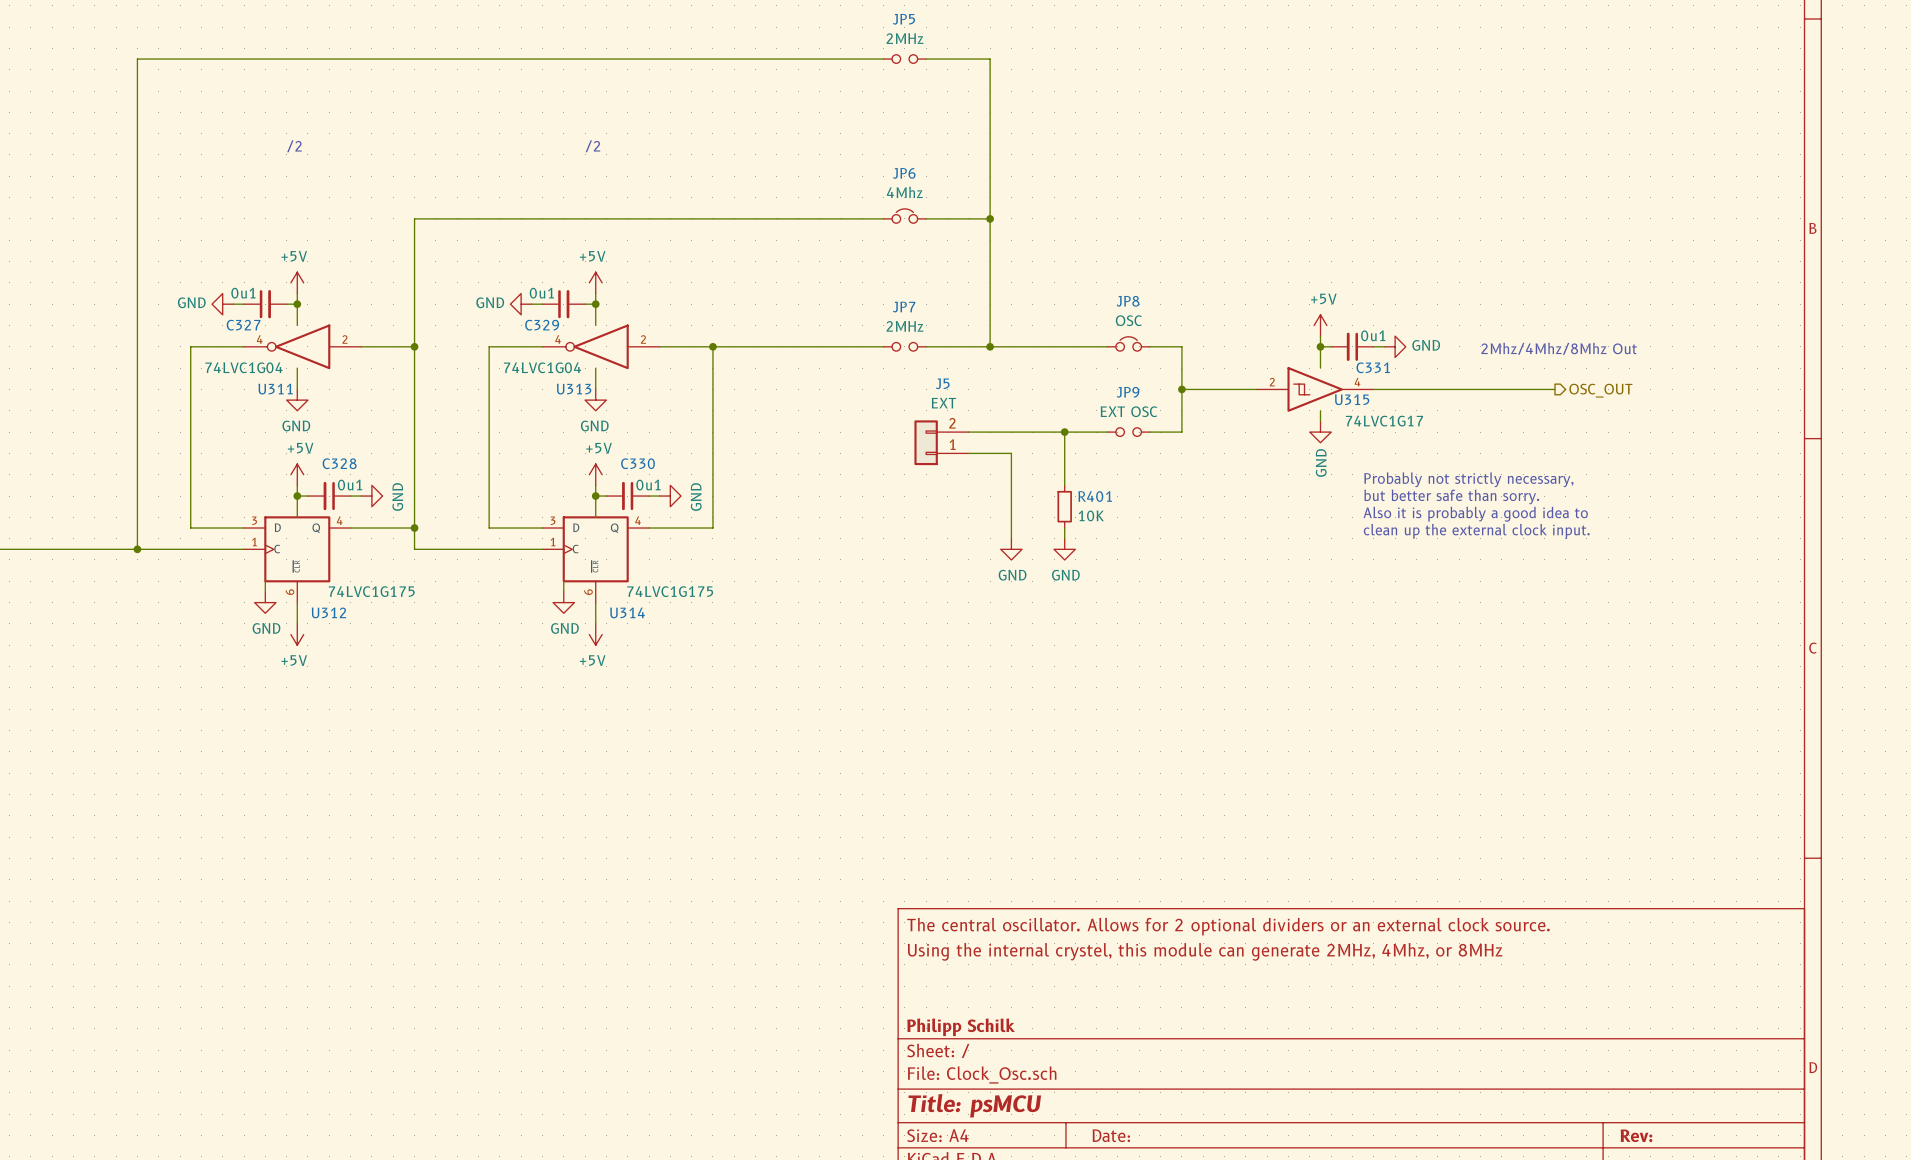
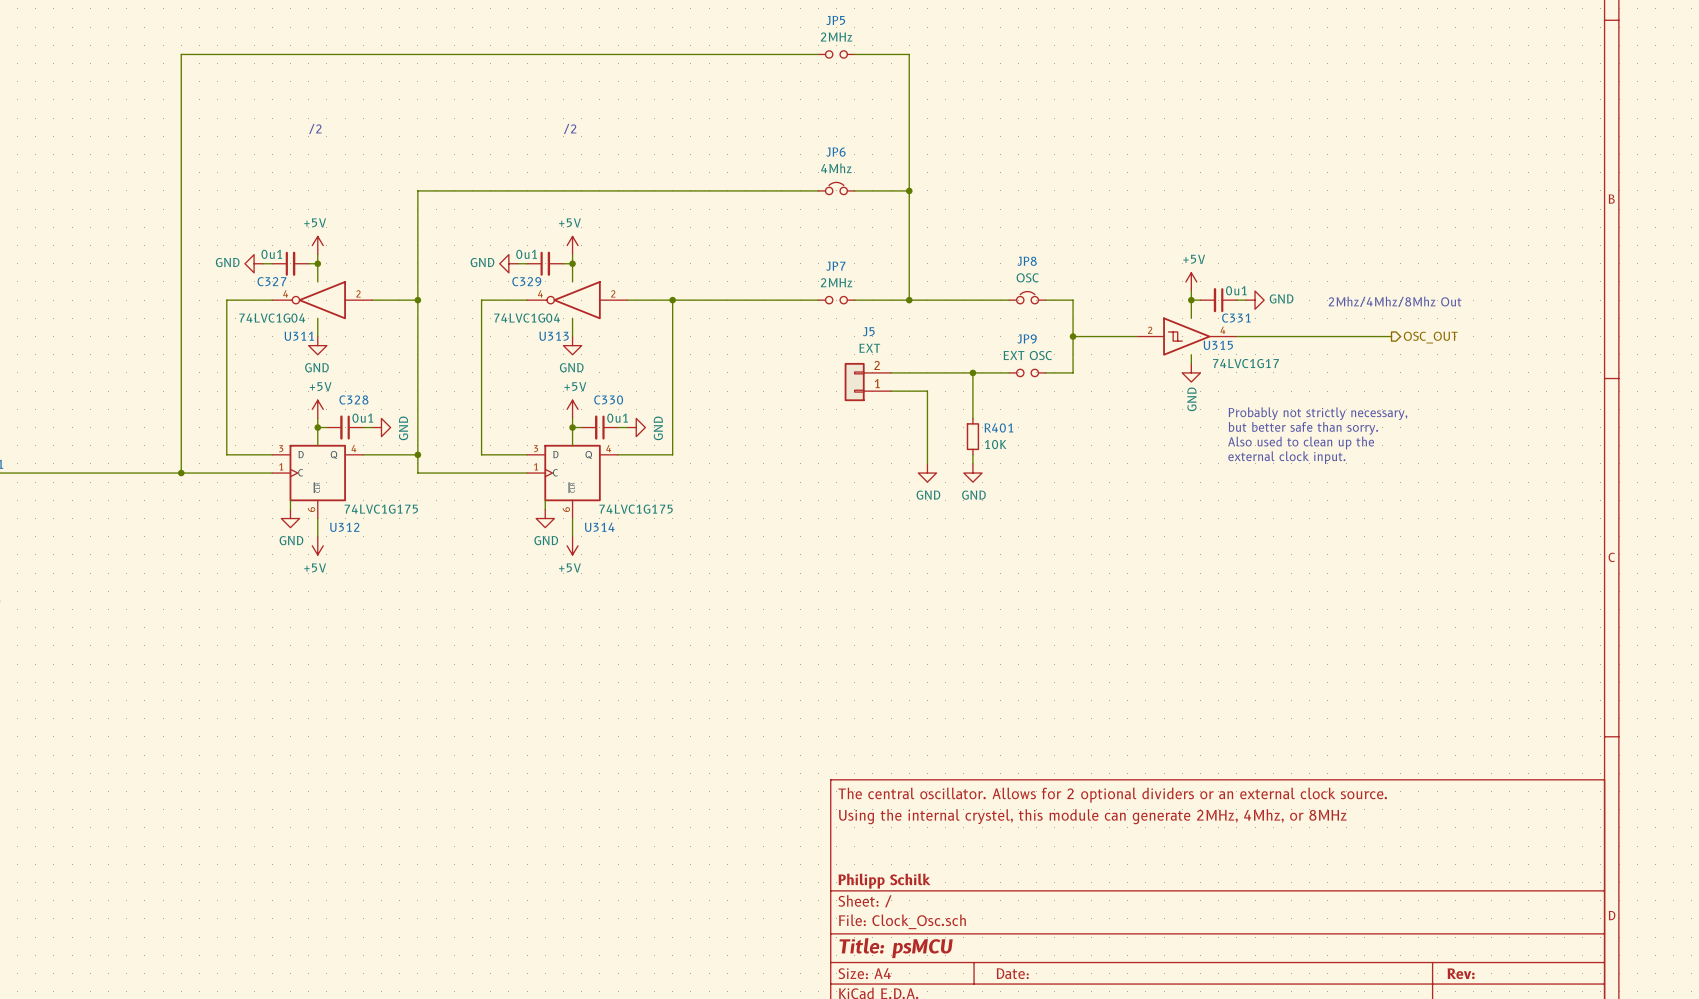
text: Also it is probably a good idea to (1475, 514) -> Also used to clean up the (1301, 443)
text: clean up the external clock input. (1476, 531) -> external clock input. (1286, 457)

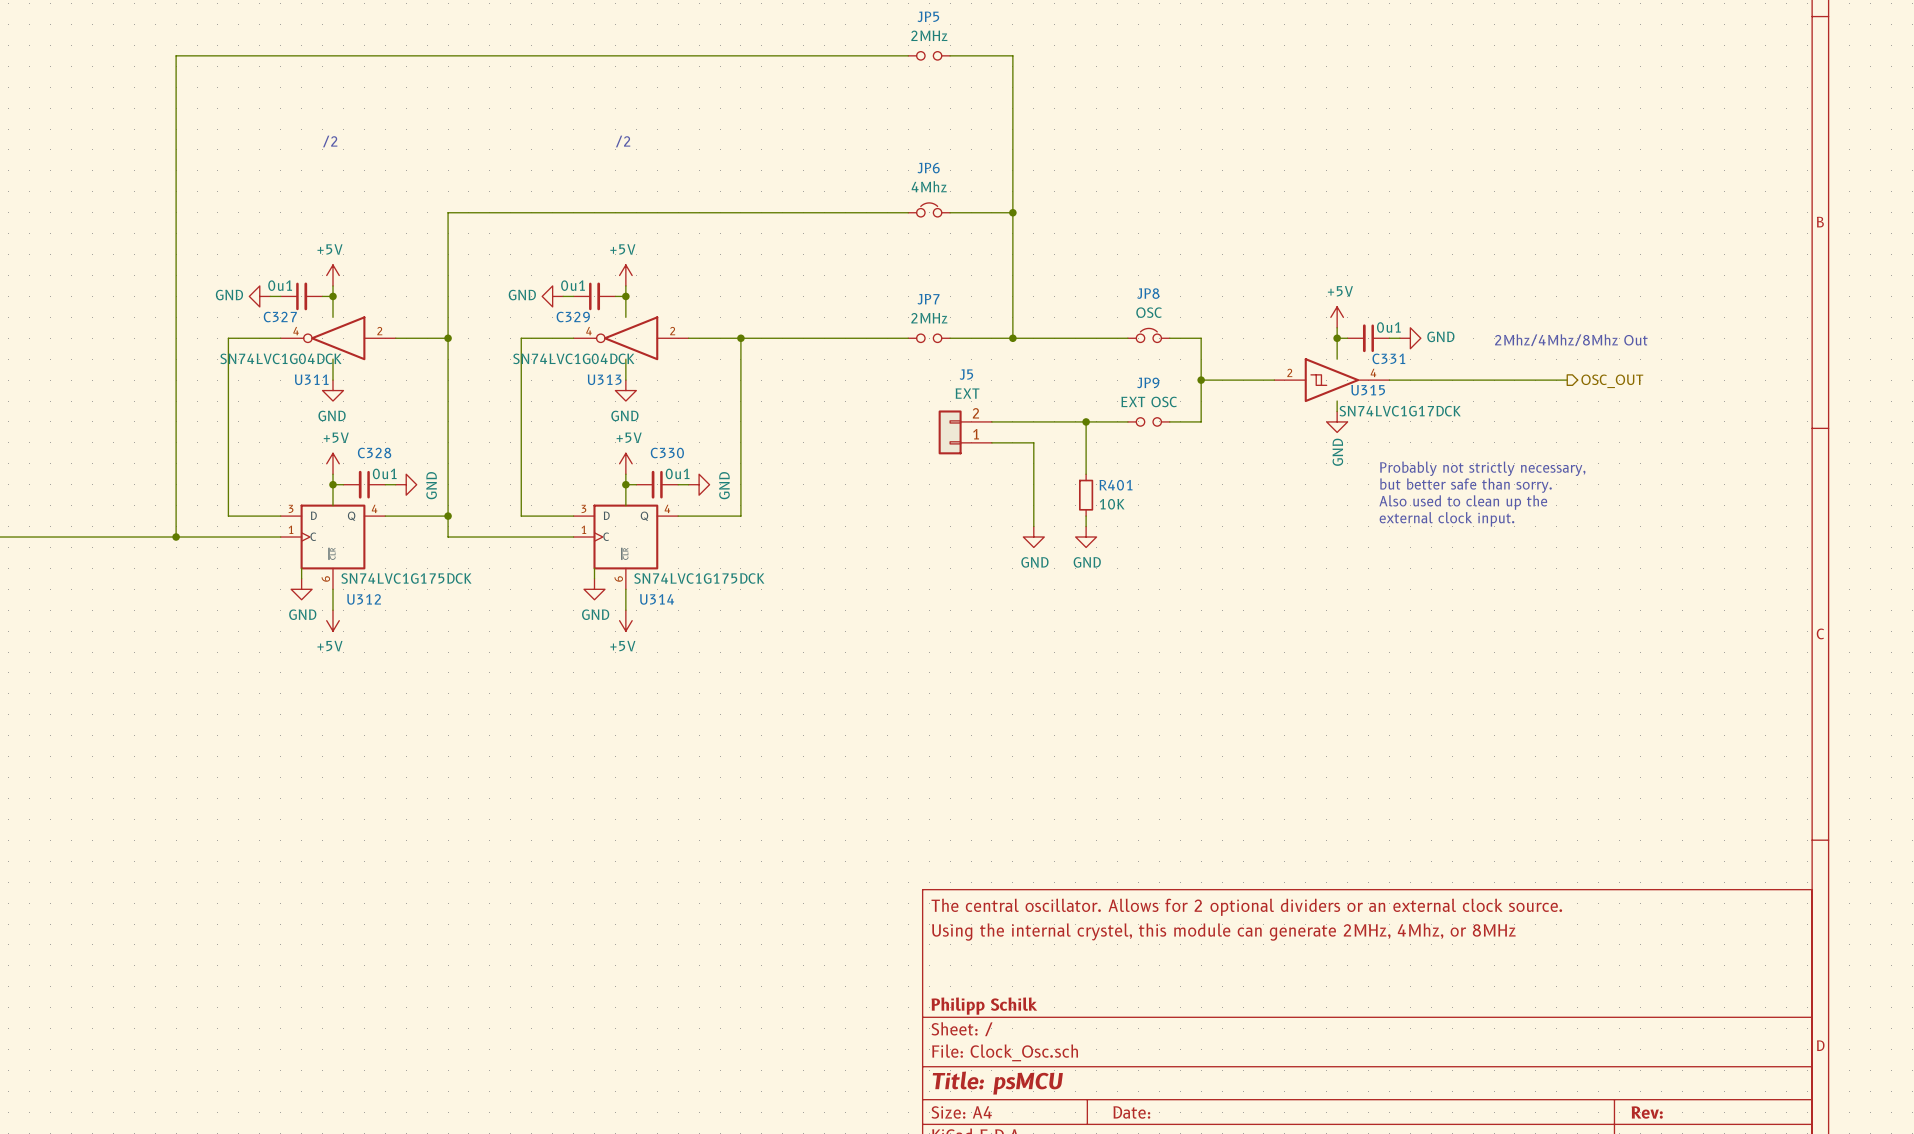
U311 value: 74LVC1G04 (272, 318) -> SN74LVC1G04DCK (280, 358)
U313 value: 74LVC1G04 (527, 318) -> SN74LVC1G04DCK (573, 358)
U315 value: 74LVC1G17 (1245, 363) -> SN74LVC1G17DCK (1400, 411)
U312 value: 74LVC1G175 (381, 509) -> SN74LVC1G175DCK (406, 578)
U314 value: 74LVC1G175 (636, 509) -> SN74LVC1G175DCK (699, 578)

